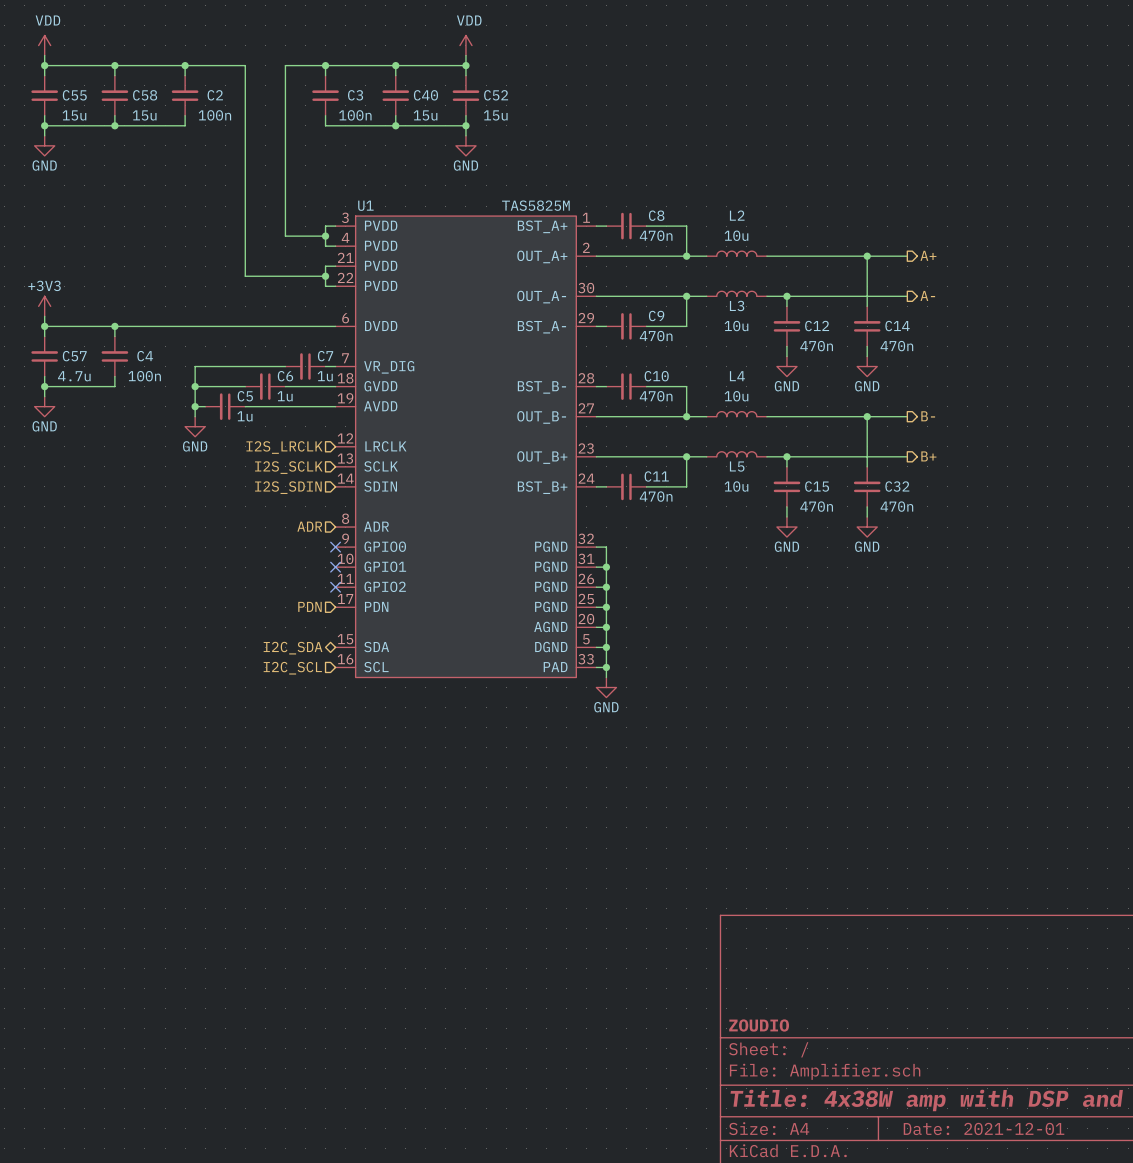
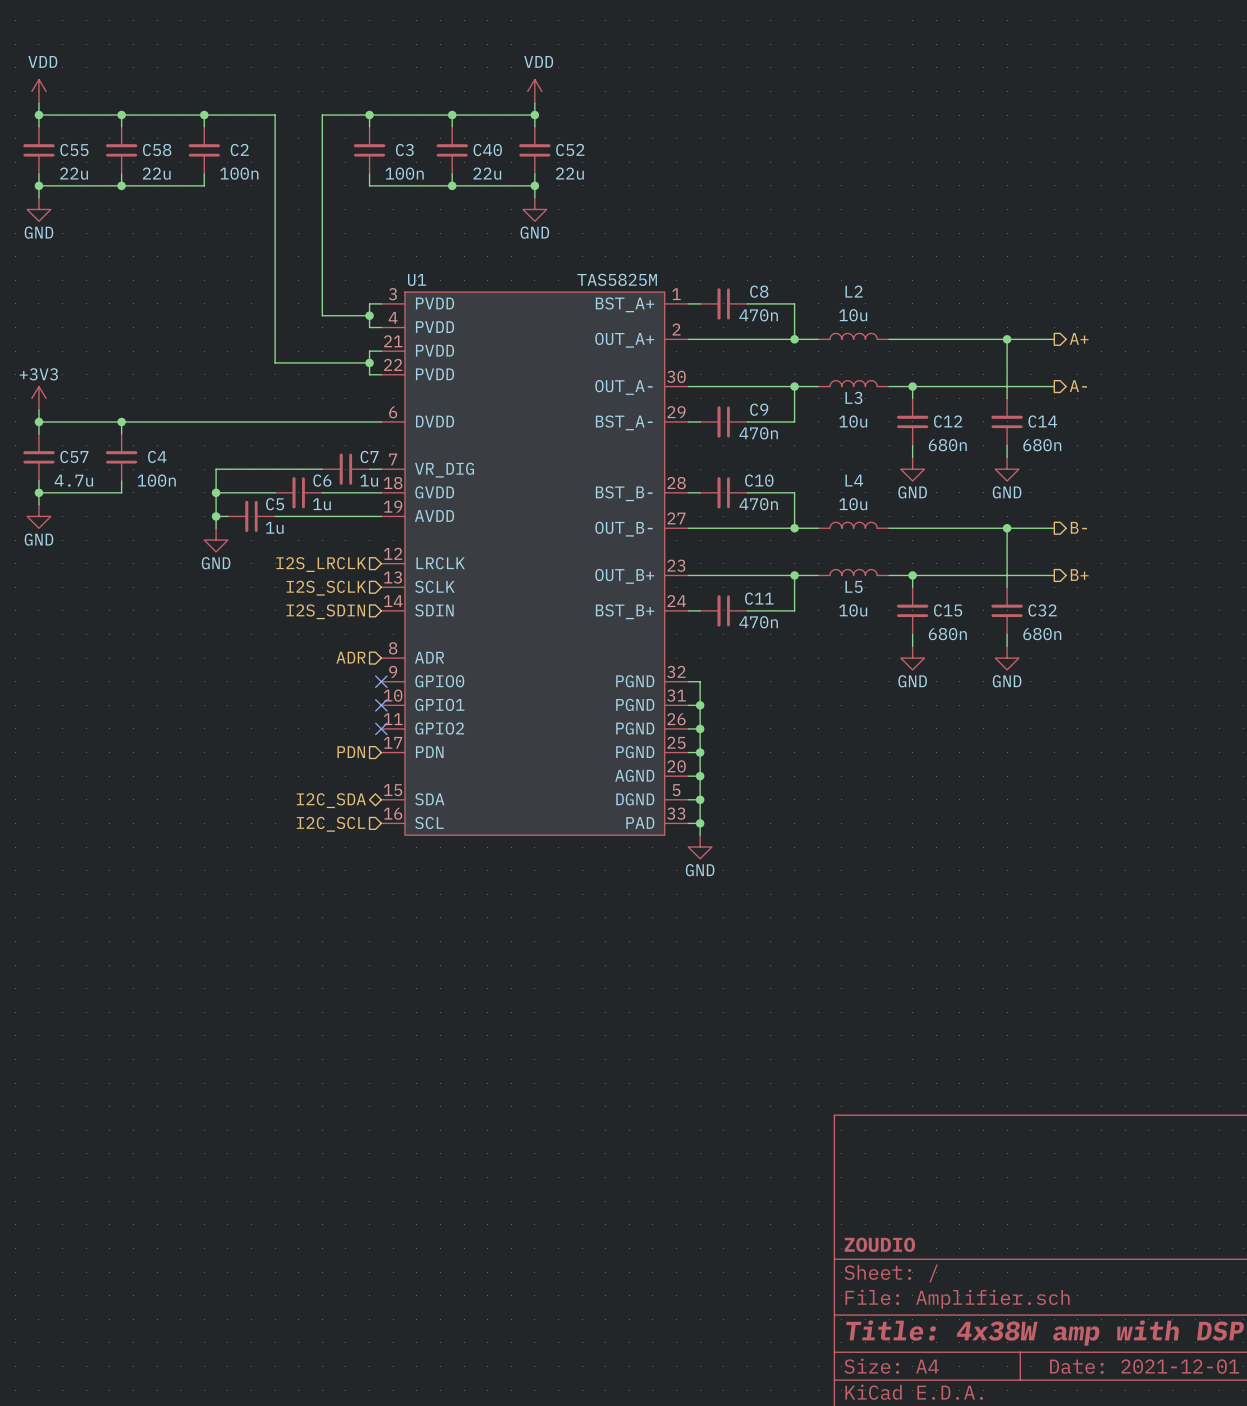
C55 value: 15u (74, 115) -> 22u (74, 173)
C58 value: 15u (144, 115) -> 22u (156, 173)
C40 value: 15u (425, 115) -> 22u (487, 173)
C52 value: 15u (495, 115) -> 22u (569, 173)
C12 value: 470n (816, 346) -> 680n (947, 445)
C14 value: 470n (896, 346) -> 680n (1042, 445)
C15 value: 470n (816, 506) -> 680n (947, 634)
C32 value: 470n (896, 506) -> 680n (1042, 634)

